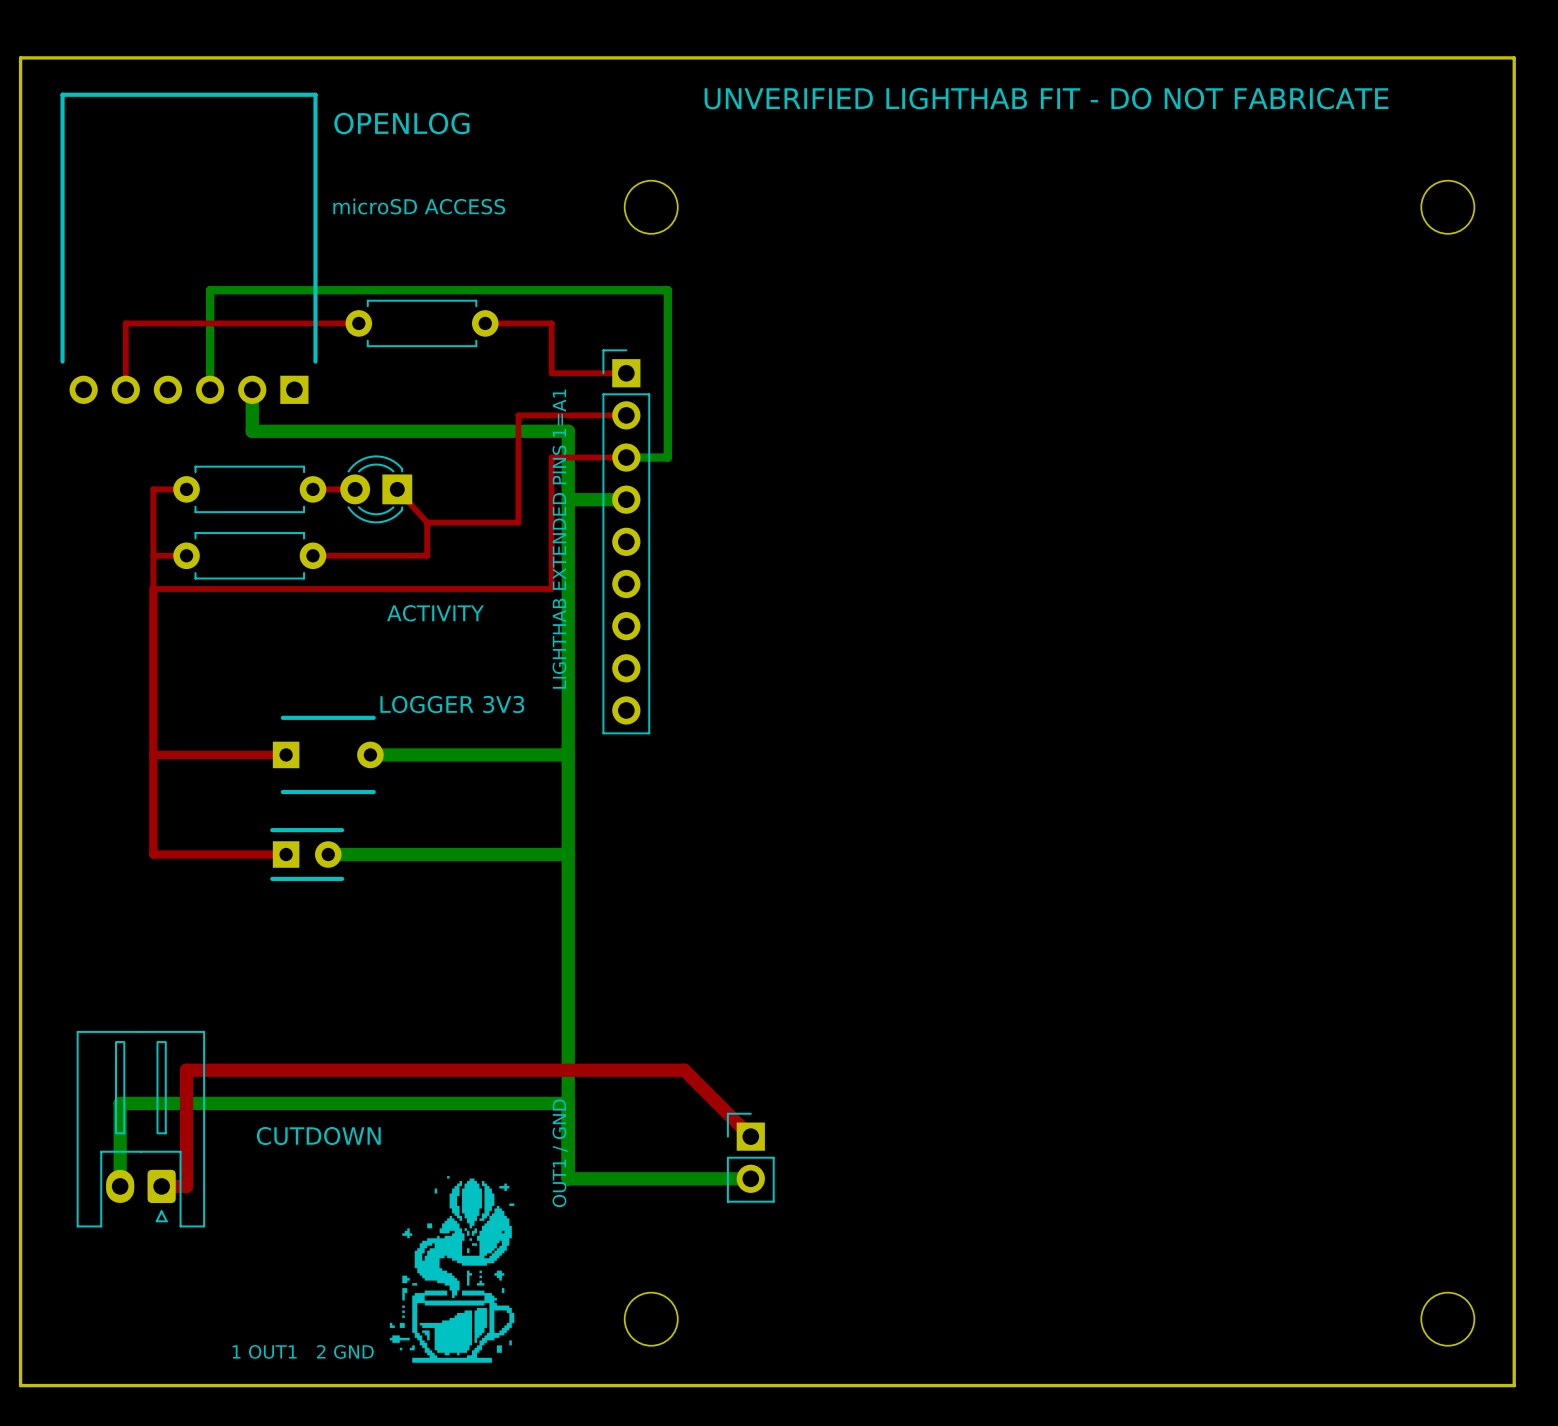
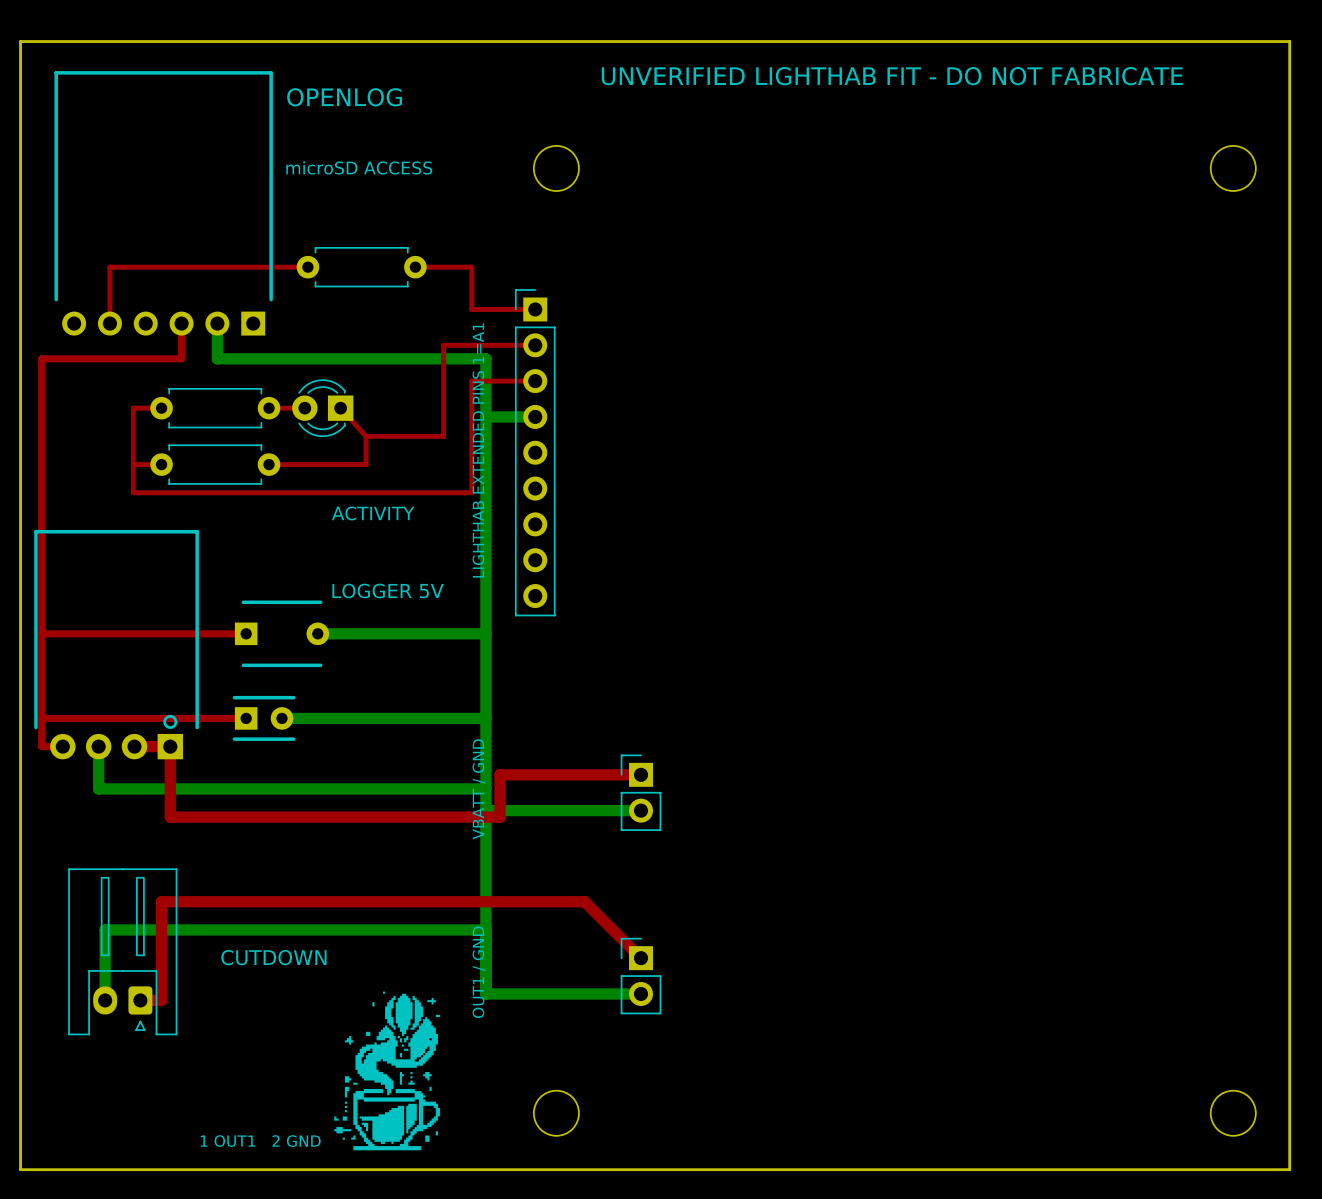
bottom track: (210, 389) (210, 290) (667, 290) (667, 457) (626, 457) -> none
top track: none -> (181, 323) (181, 358) (41, 358) (41, 746) (62, 746)
top track: (153, 588) (153, 854) -> (41, 718) (133, 718)
text: LOGGER 3V3 (452, 704) -> LOGGER 5V (388, 590)
top track: none -> (41, 633) (133, 633)
part: none -> (116, 644)
bottom track: none -> (98, 746) (98, 788) (485, 788)
top track: none -> (134, 746) (170, 746) (170, 817) (499, 817) (499, 774) (641, 774)
text: none -> VBATT / GND (479, 789)
part: none -> (641, 792)
bottom track: none -> (485, 810) (641, 810)

